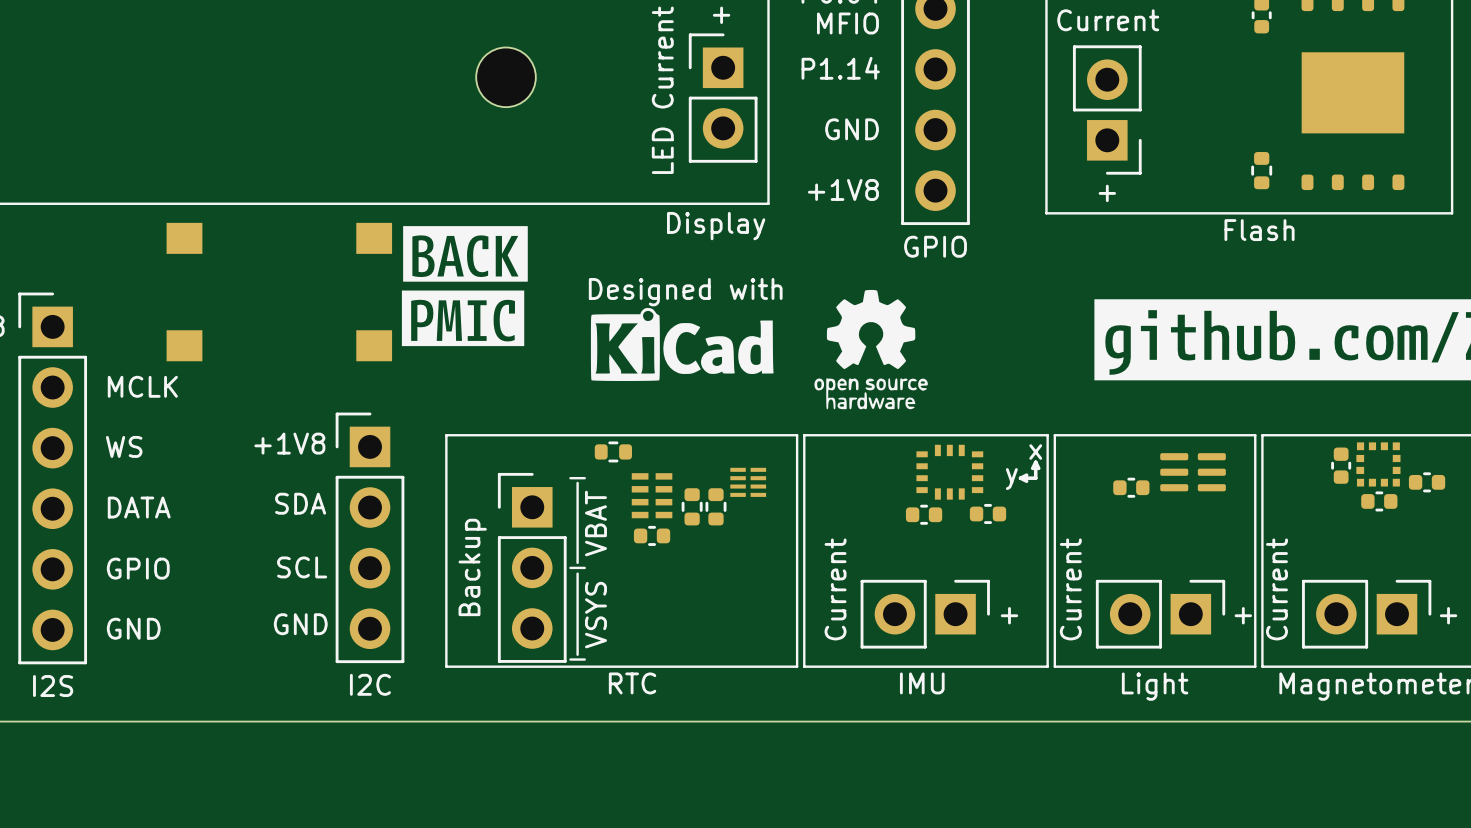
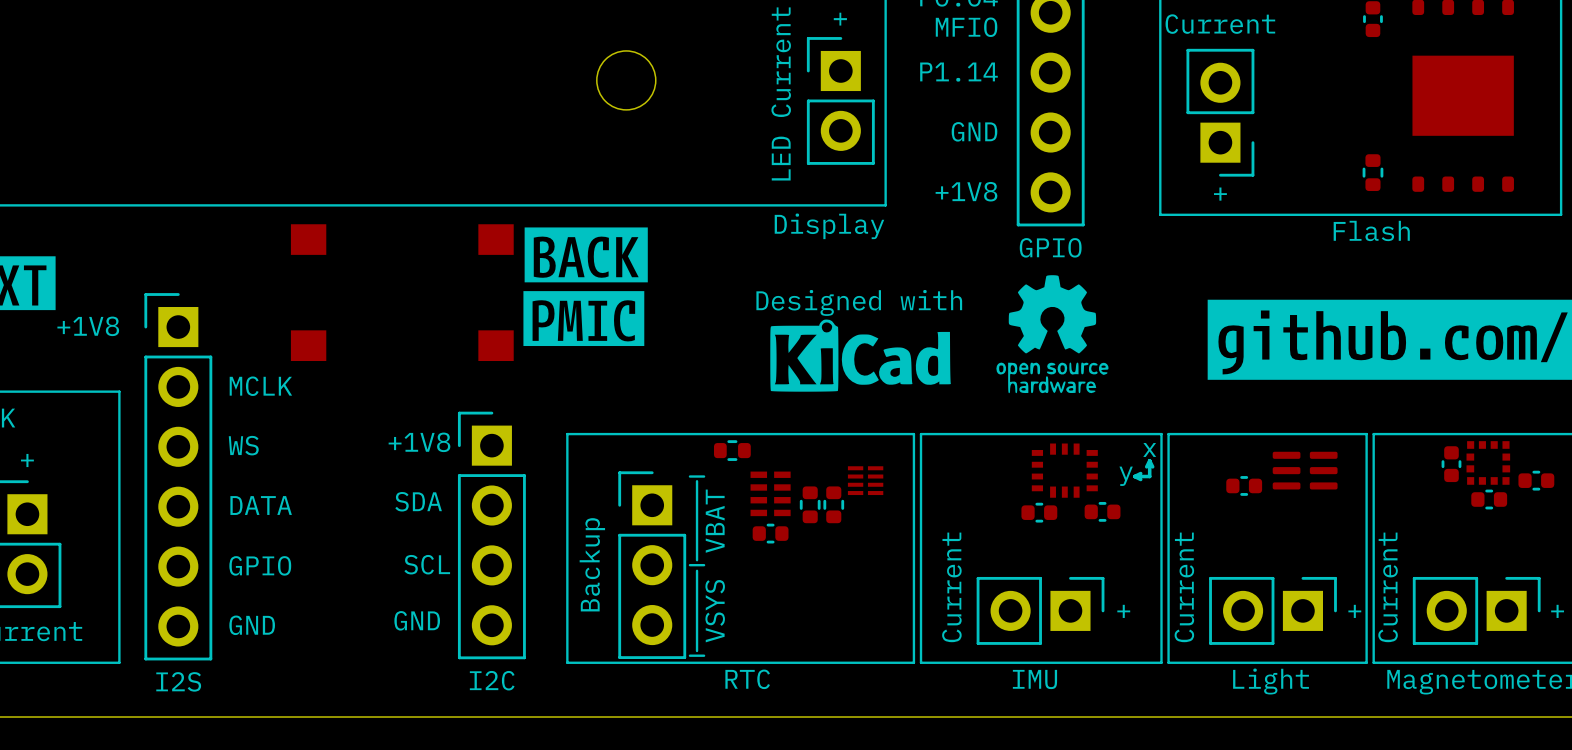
text position: Designed with (685, 292) -> Designed with (859, 302)
drawing position: (682, 344) -> (860, 355)
drawing position: (871, 349) -> (1052, 334)

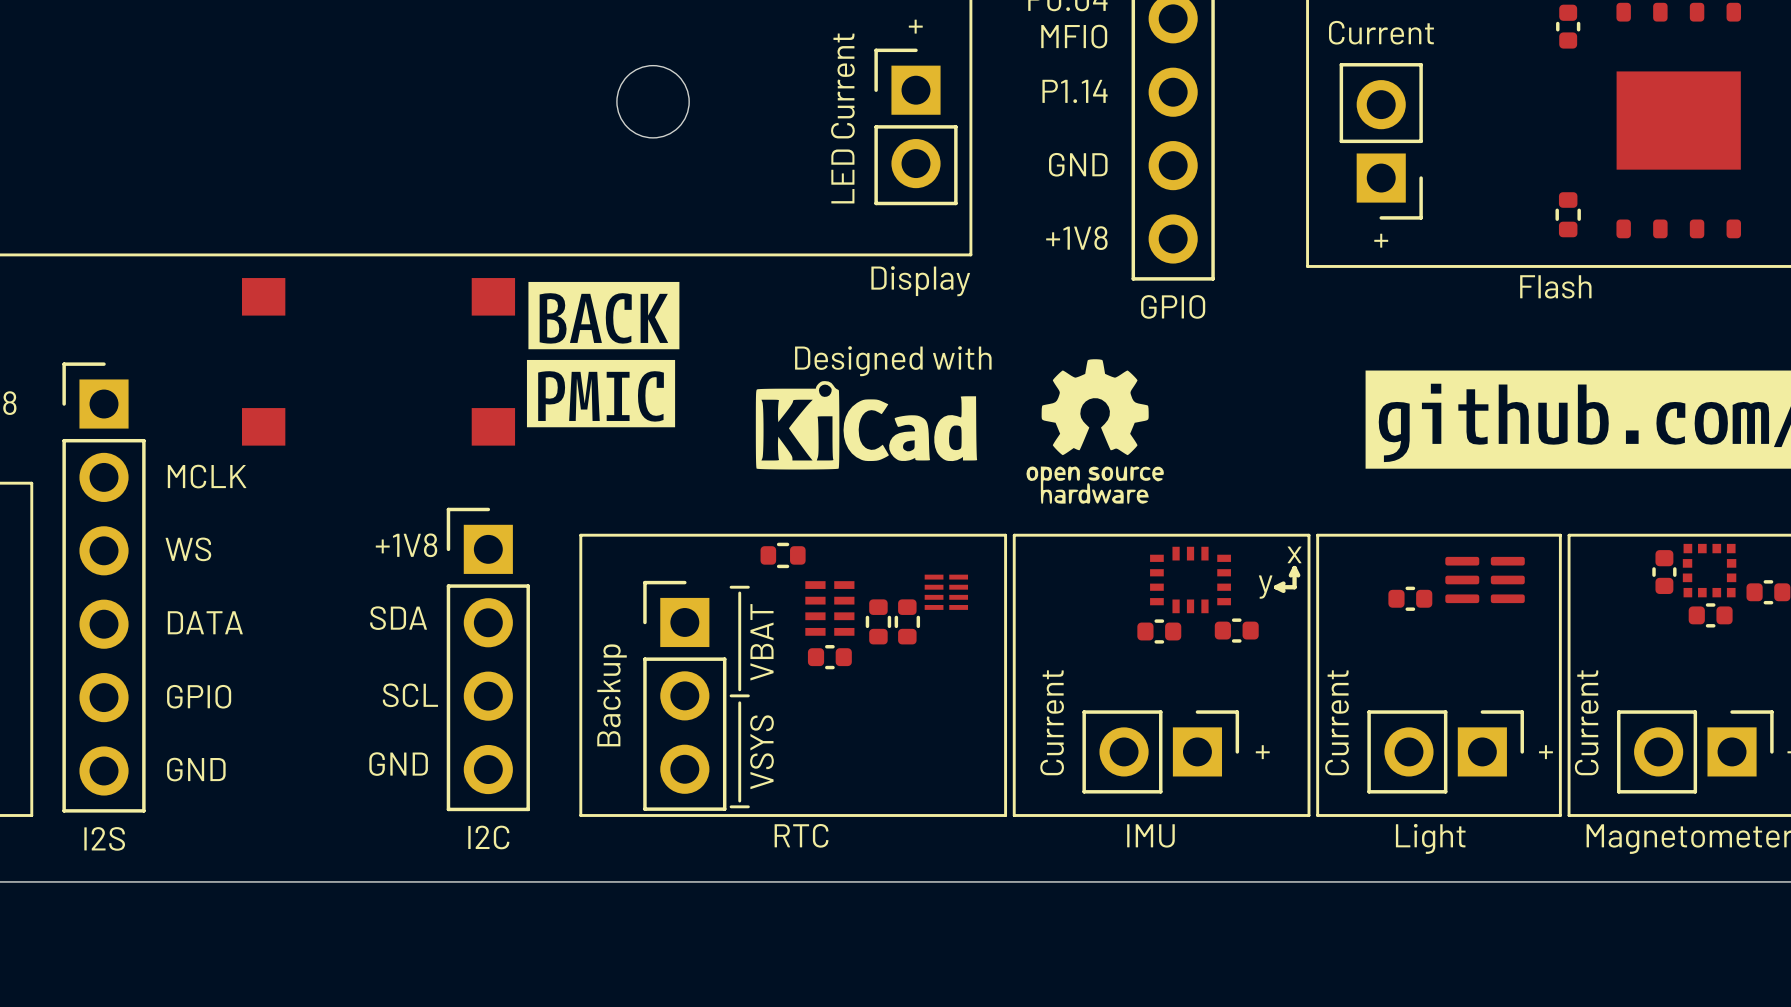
text position: Designed with (859, 302) -> Designed with (893, 361)
drawing position: (1052, 334) -> (1095, 431)
drawing position: (860, 355) -> (866, 425)

